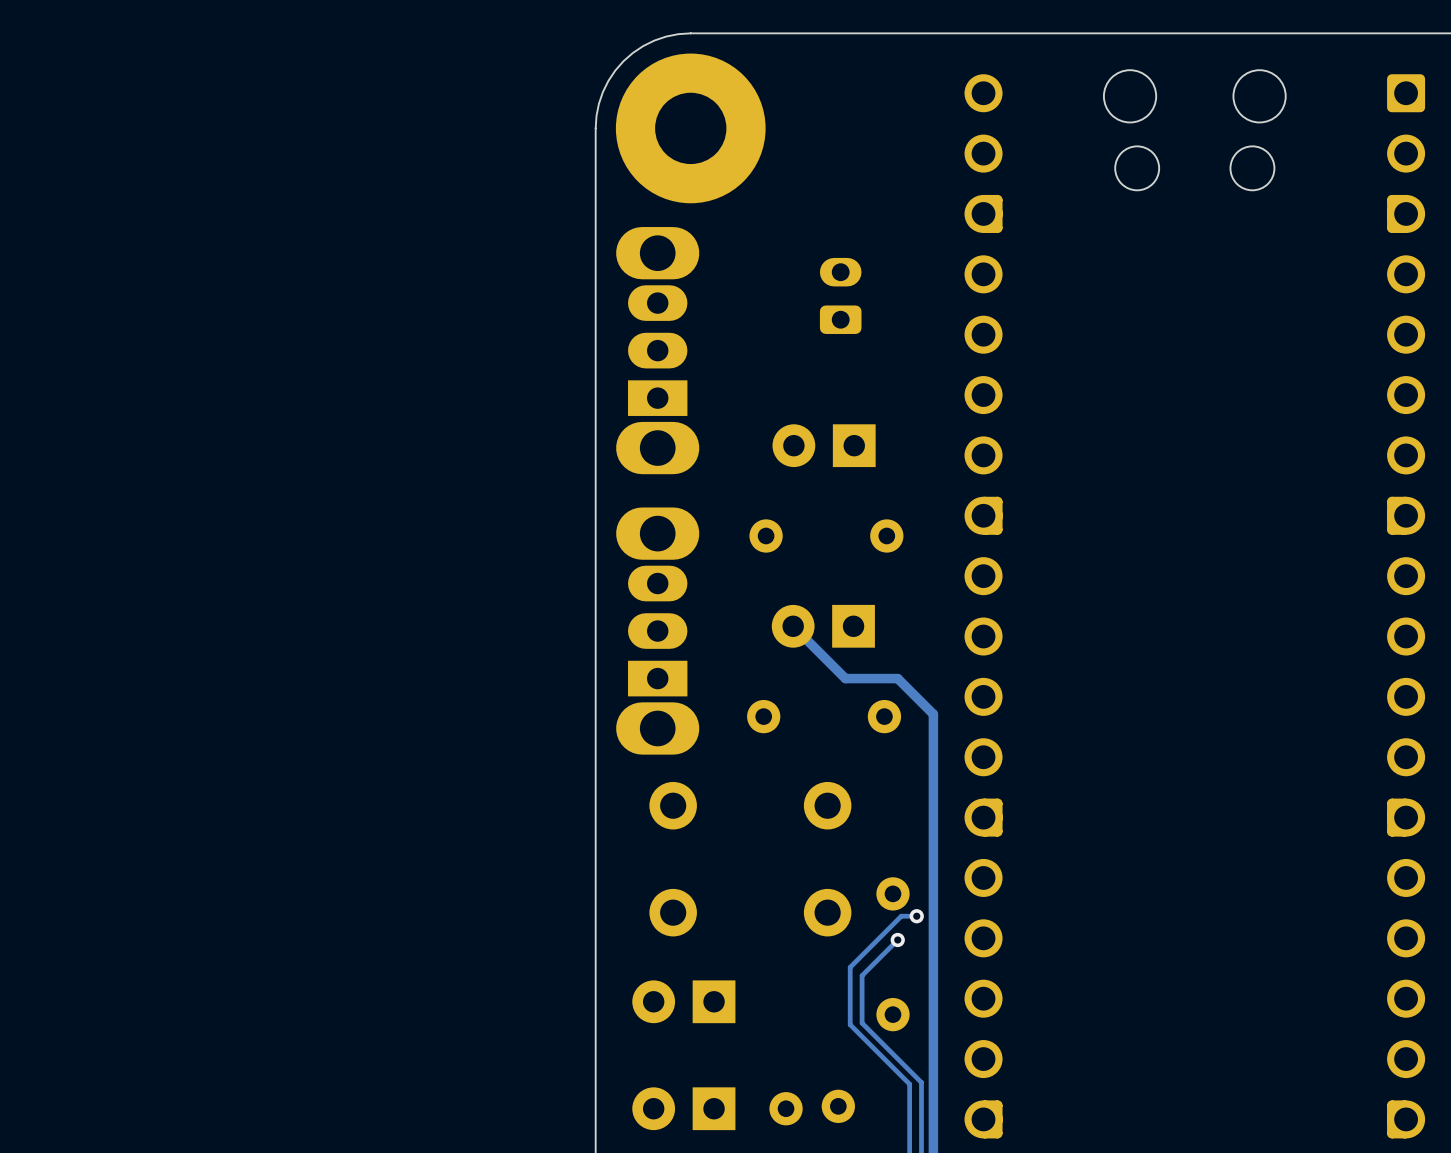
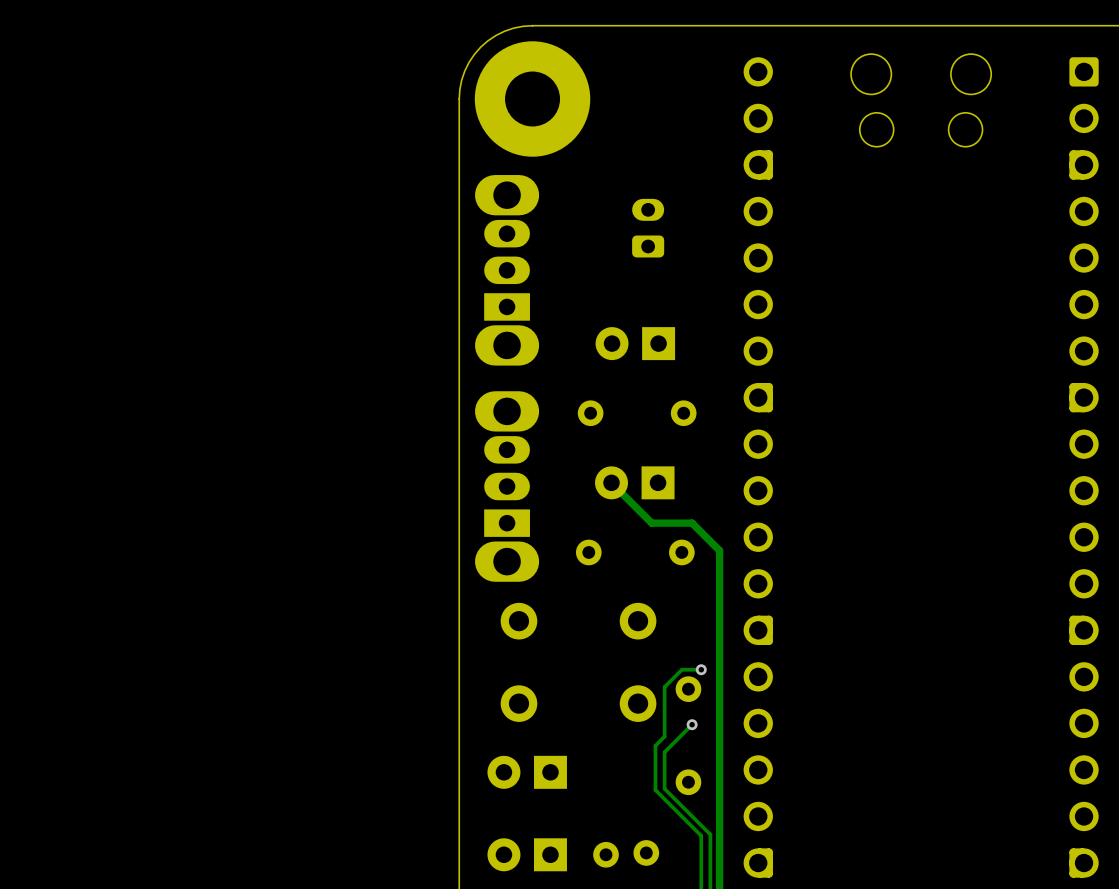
track: (916, 916) (901, 916) (862, 955) -> (701, 669) (681, 669) (664, 687) (664, 736)
via position: (916, 916) -> (701, 669)

